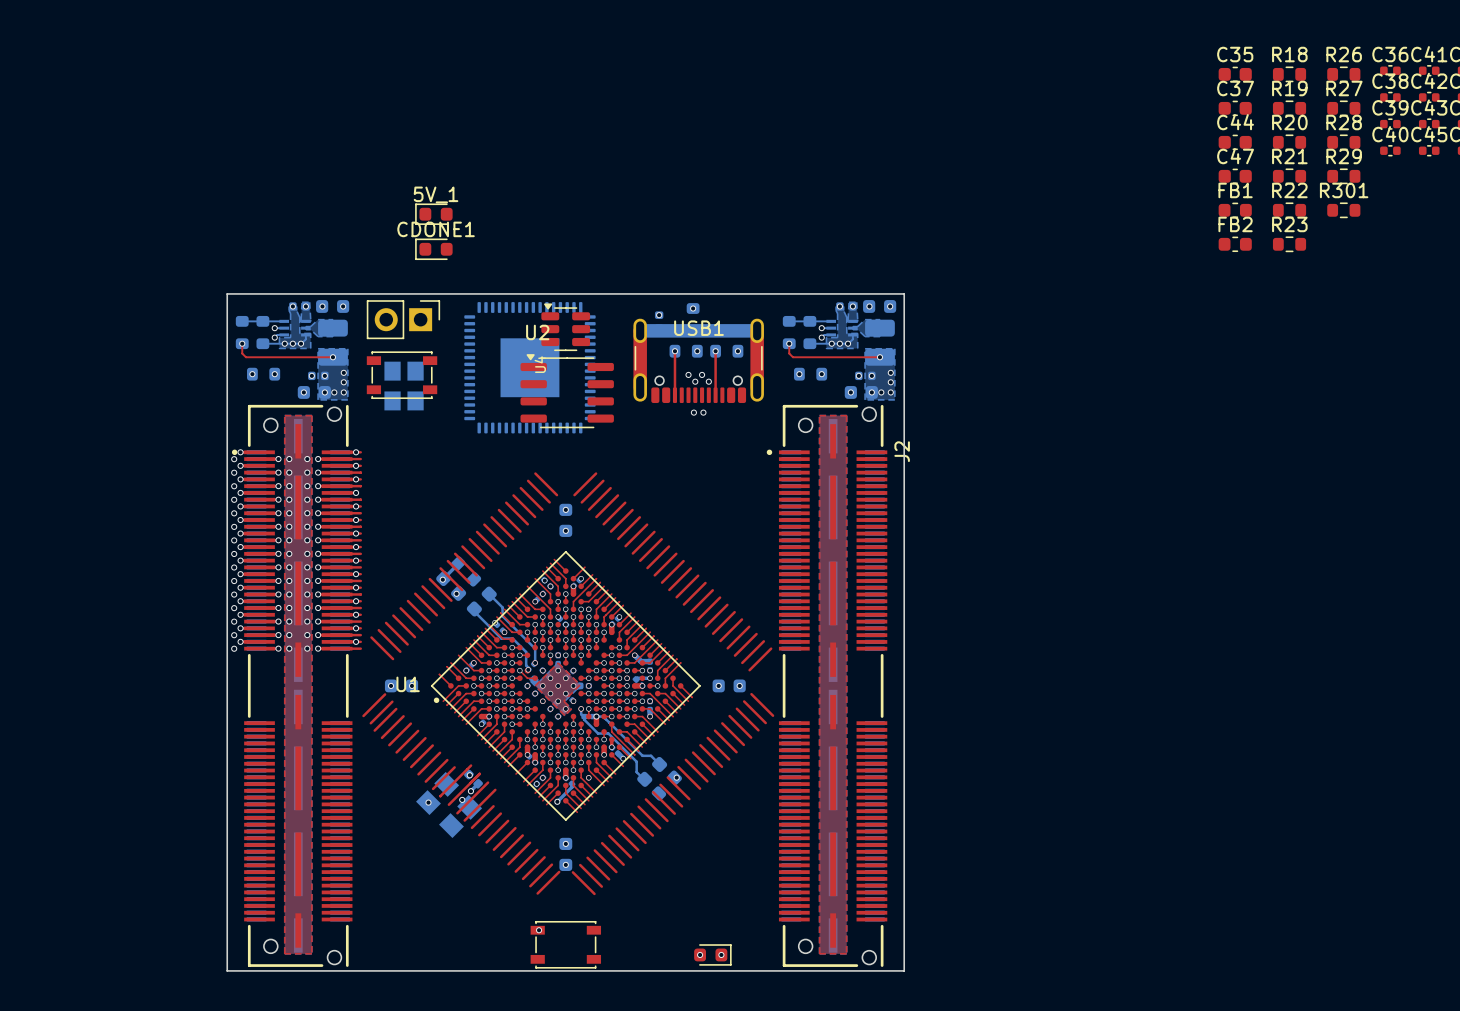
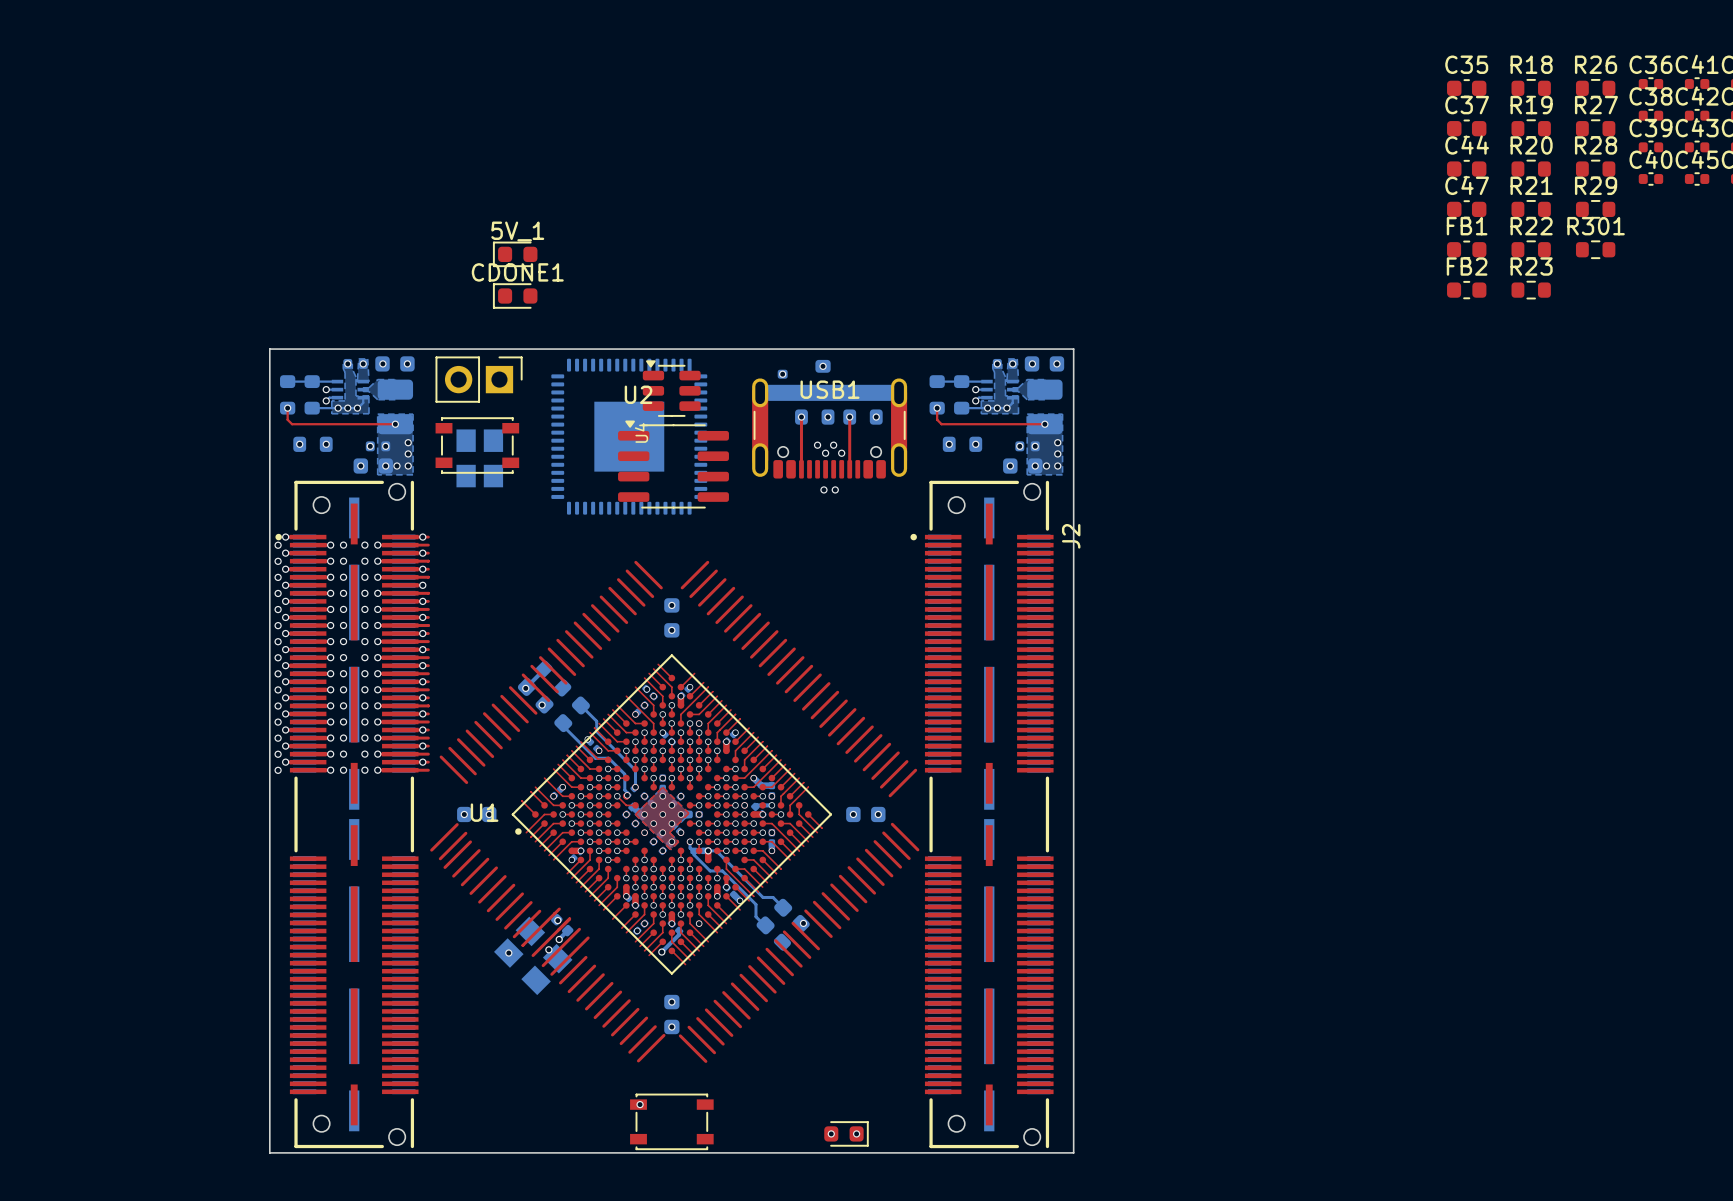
top zone outline: (284, 415) (311, 415) (311, 953) (284, 953) (284, 415) -> none
top zone outline: (819, 415) (846, 415) (846, 953) (819, 953) (819, 415) -> none

